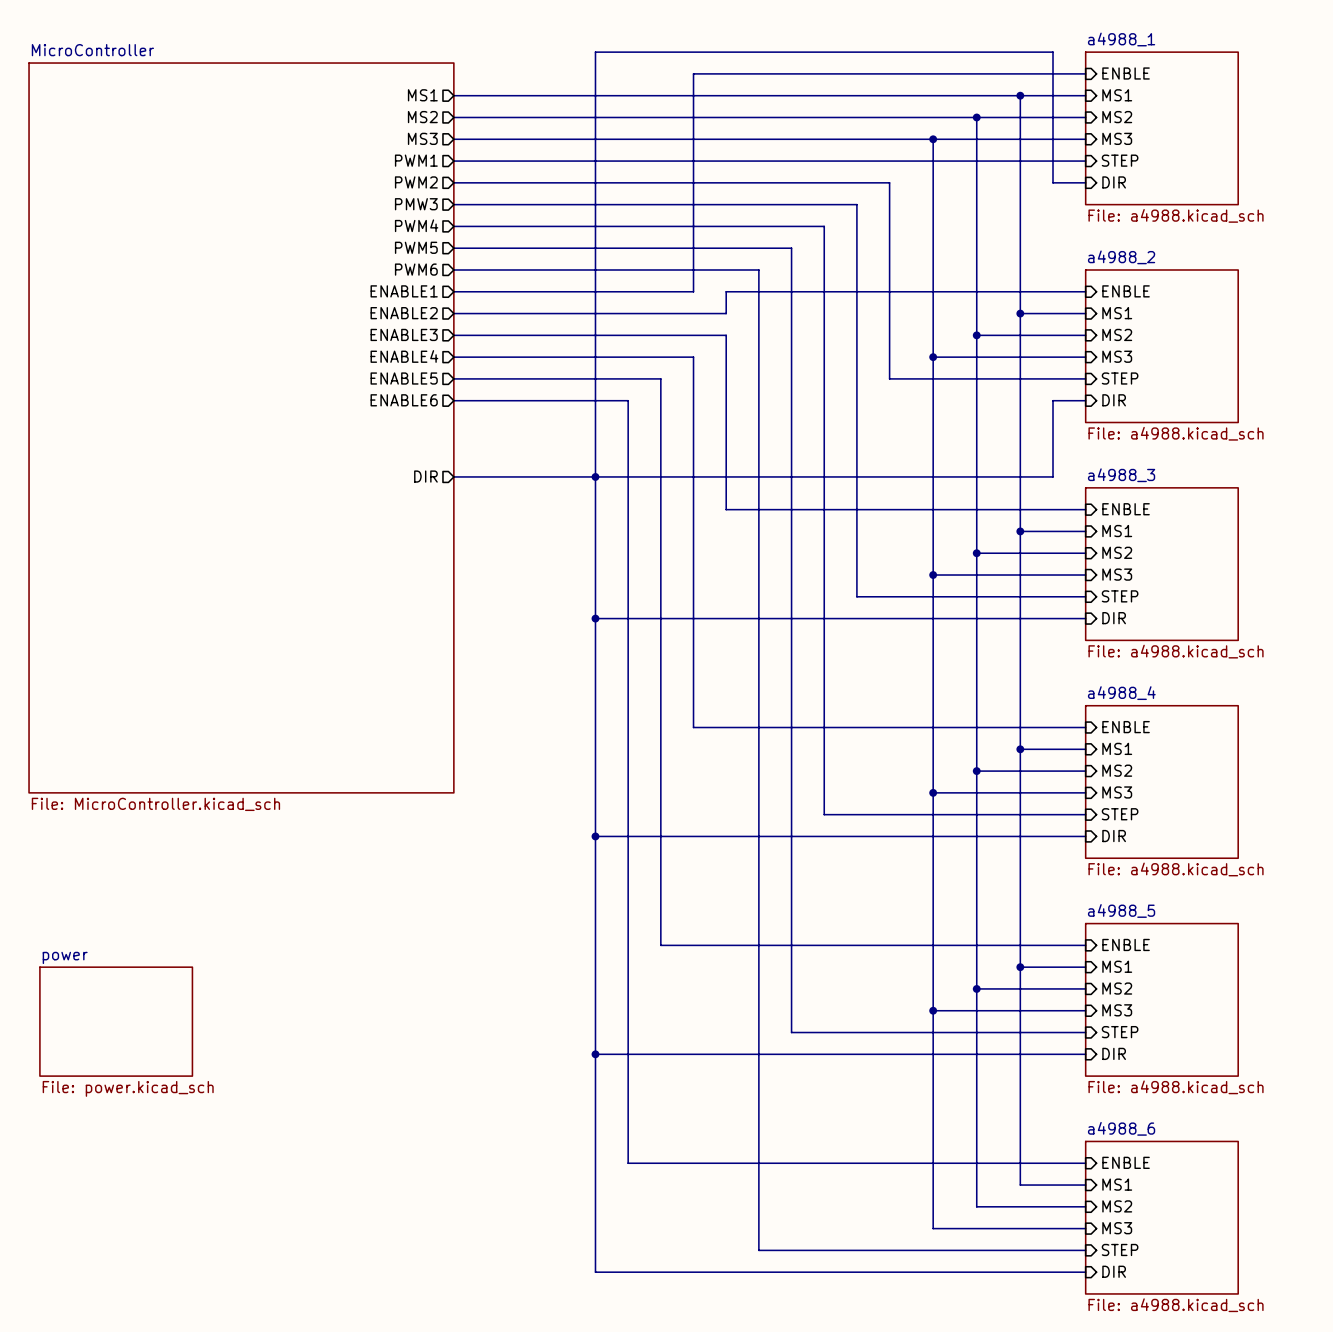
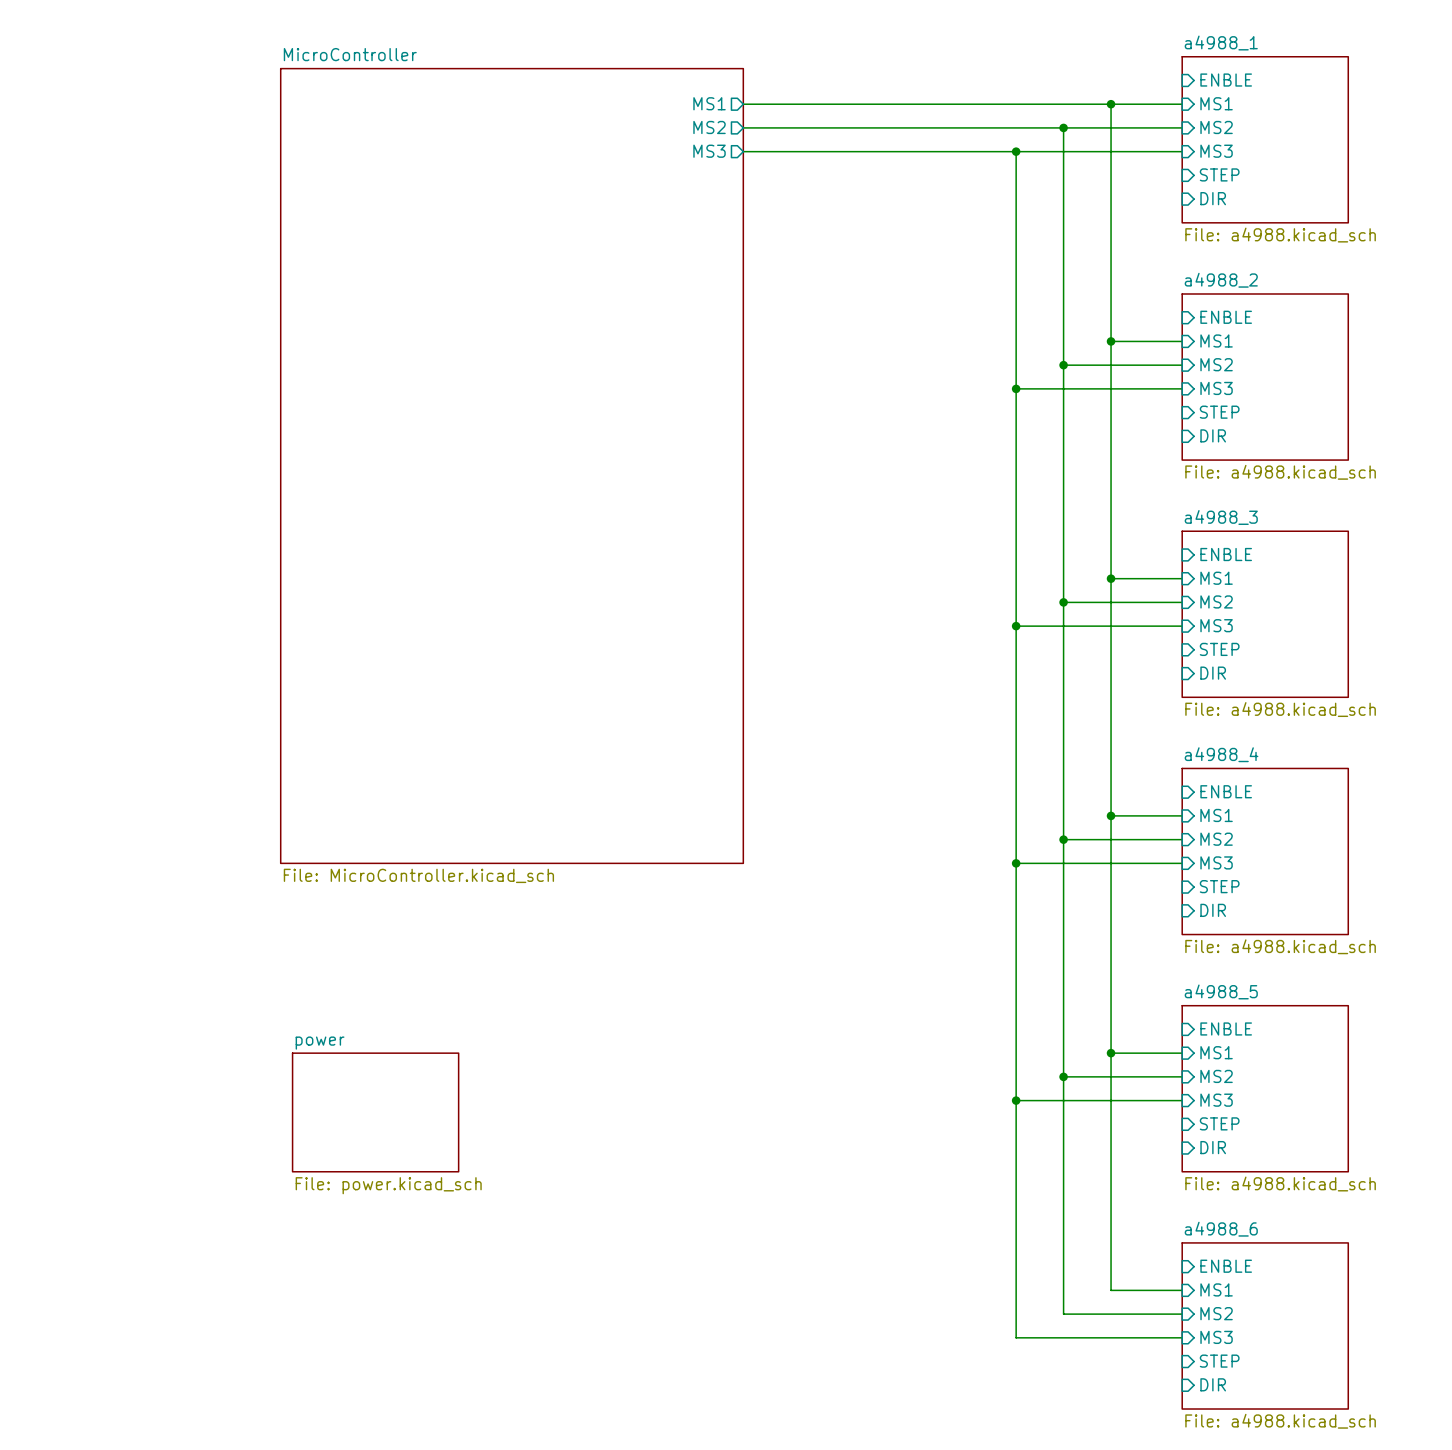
wire: (1085, 73) (693, 73) (693, 291) (453, 291) -> none
sheet pin: MS1 (422, 95) -> none
wire: (453, 95) (682, 95) -> none
sheet pin: none -> MS1 (709, 103)
sheet pin: MS2 (422, 117) -> none
wire: (453, 117) (682, 117) -> none
sheet pin: none -> MS2 (709, 127)
sheet pin: MS3 (422, 138) -> none
sheet pin: none -> MS3 (709, 151)
wire: (453, 139) (682, 139) -> none
sheet pin: PWM1 (416, 160) -> none
wire: (453, 161) (1085, 161) -> none
sheet pin: PWM2 (416, 182) -> none
wire: (453, 182) (889, 182) (889, 378) (1085, 378) -> none
wire: (1085, 182) (1053, 182) (1053, 52) (595, 52) (595, 1272) (1085, 1272) -> none
sheet pin: PMW3 (416, 204) -> none
wire: (453, 204) (856, 204) (856, 596) (1085, 596) -> none
sheet pin: PWM4 (416, 225) -> none
wire: (453, 226) (824, 226) (824, 814) (1085, 814) -> none
sheet pin: PWM5 (416, 247) -> none
wire: (453, 248) (791, 248) (791, 1032) (1085, 1032) -> none
sheet pin: PWM6 (416, 269) -> none
wire: (453, 269) (758, 269) (758, 1250) (1085, 1250) -> none
sheet pin: ENABLE1 (404, 291) -> none
wire: (1085, 291) (726, 291) (726, 313) (453, 313) -> none
sheet pin: ENABLE2 (404, 313) -> none
sheet pin: ENABLE3 (404, 334) -> none
wire: (453, 335) (726, 335) (726, 509) (1085, 509) -> none
sheet pin: ENABLE4 (404, 356) -> none
wire: (453, 357) (693, 357) (693, 727) (1085, 727) -> none
sheet pin: ENABLE5 (404, 378) -> none
wire: (453, 378) (660, 378) (660, 945) (1085, 945) -> none
sheet pin: ENABLE6 (404, 400) -> none
wire: (453, 400) (628, 400) (628, 1163) (1085, 1163) -> none
wire: (1085, 400) (1053, 400) (1053, 476) (453, 476) -> none
sheet MicroController: File: MicroController.kicad_sch (241, 427) -> none
sheet MicroController: none -> File: MicroController.kicad_sch (512, 465)
sheet pin: DIR (425, 476) -> none
junction: (595, 476) -> none
wire: (595, 618) (1085, 618) -> none
junction: (595, 618) -> none
wire: (595, 836) (1085, 836) -> none
junction: (595, 836) -> none
sheet power: File: power.kicad_sch (116, 1021) -> none
sheet power: none -> File: power.kicad_sch (375, 1112)
wire: (595, 1054) (1085, 1054) -> none
junction: (595, 1054) -> none

